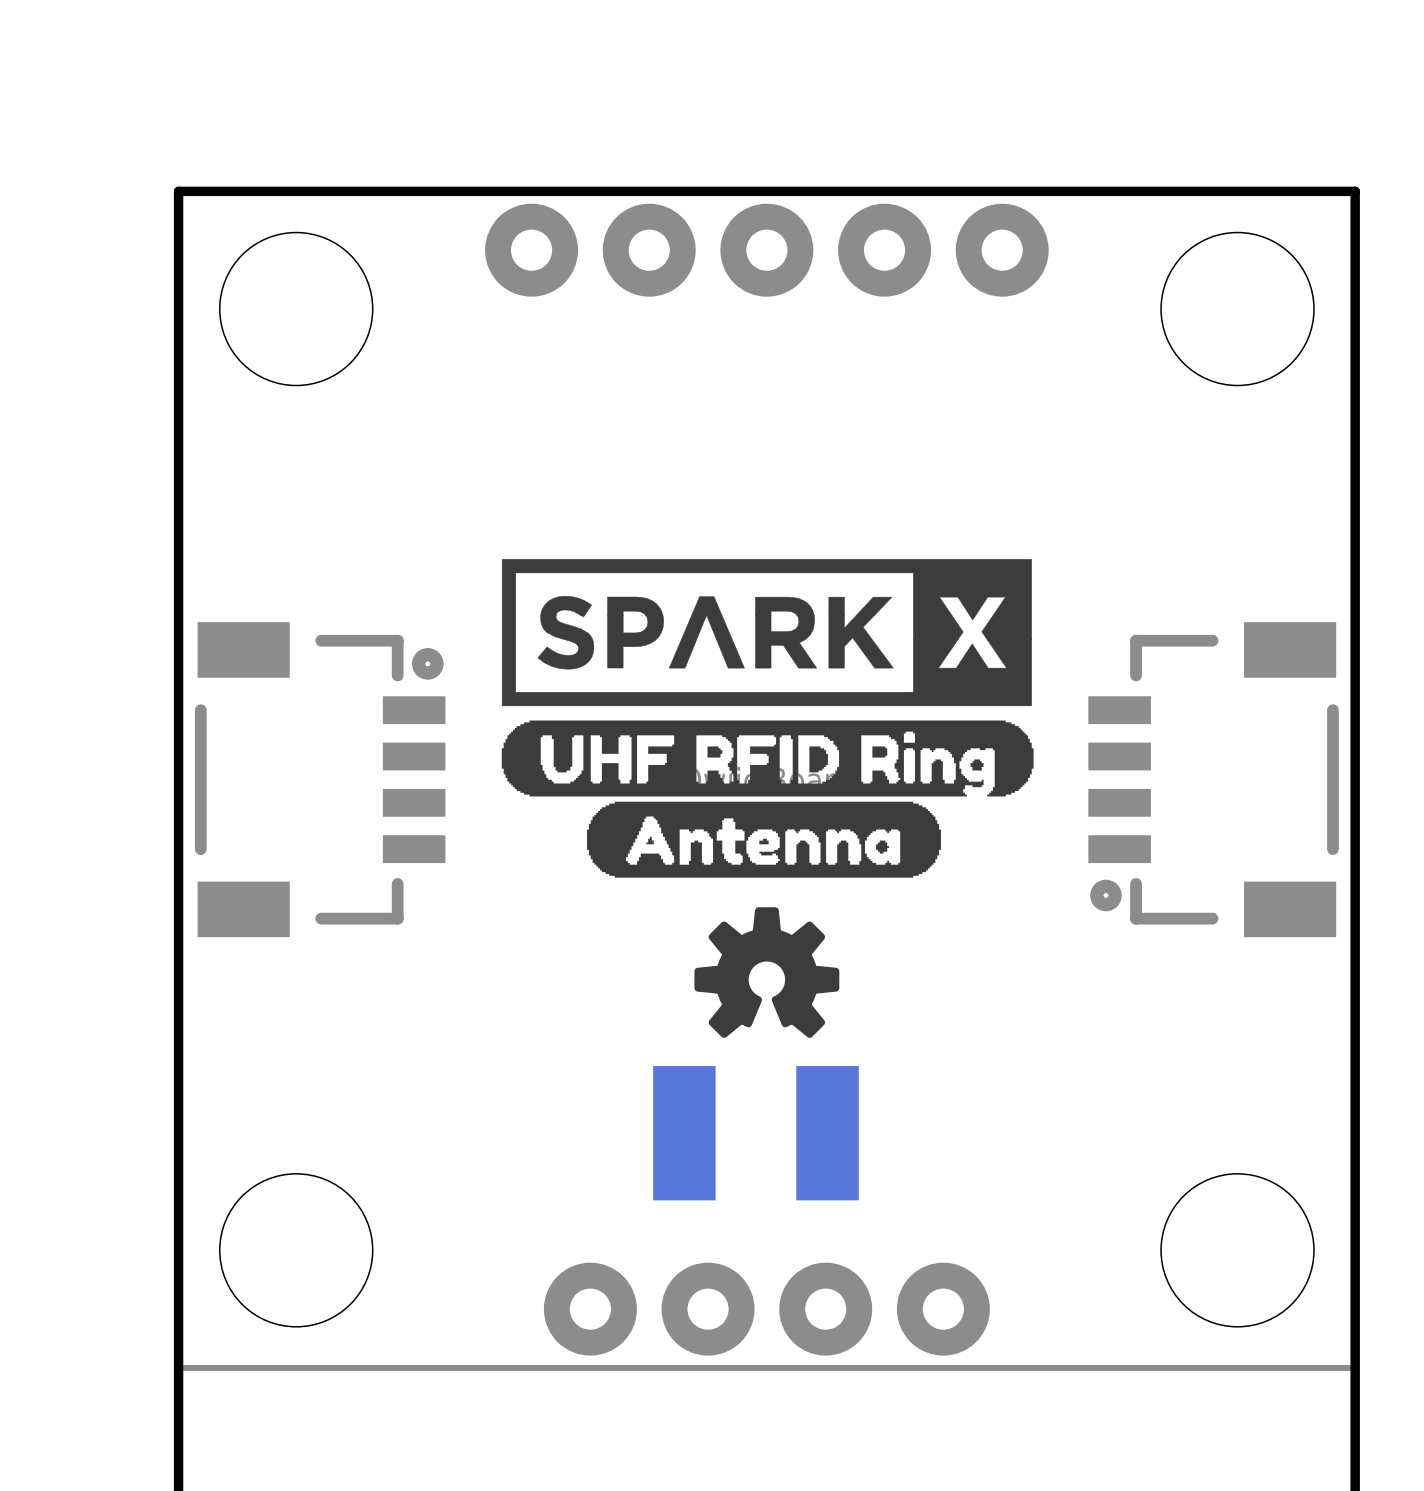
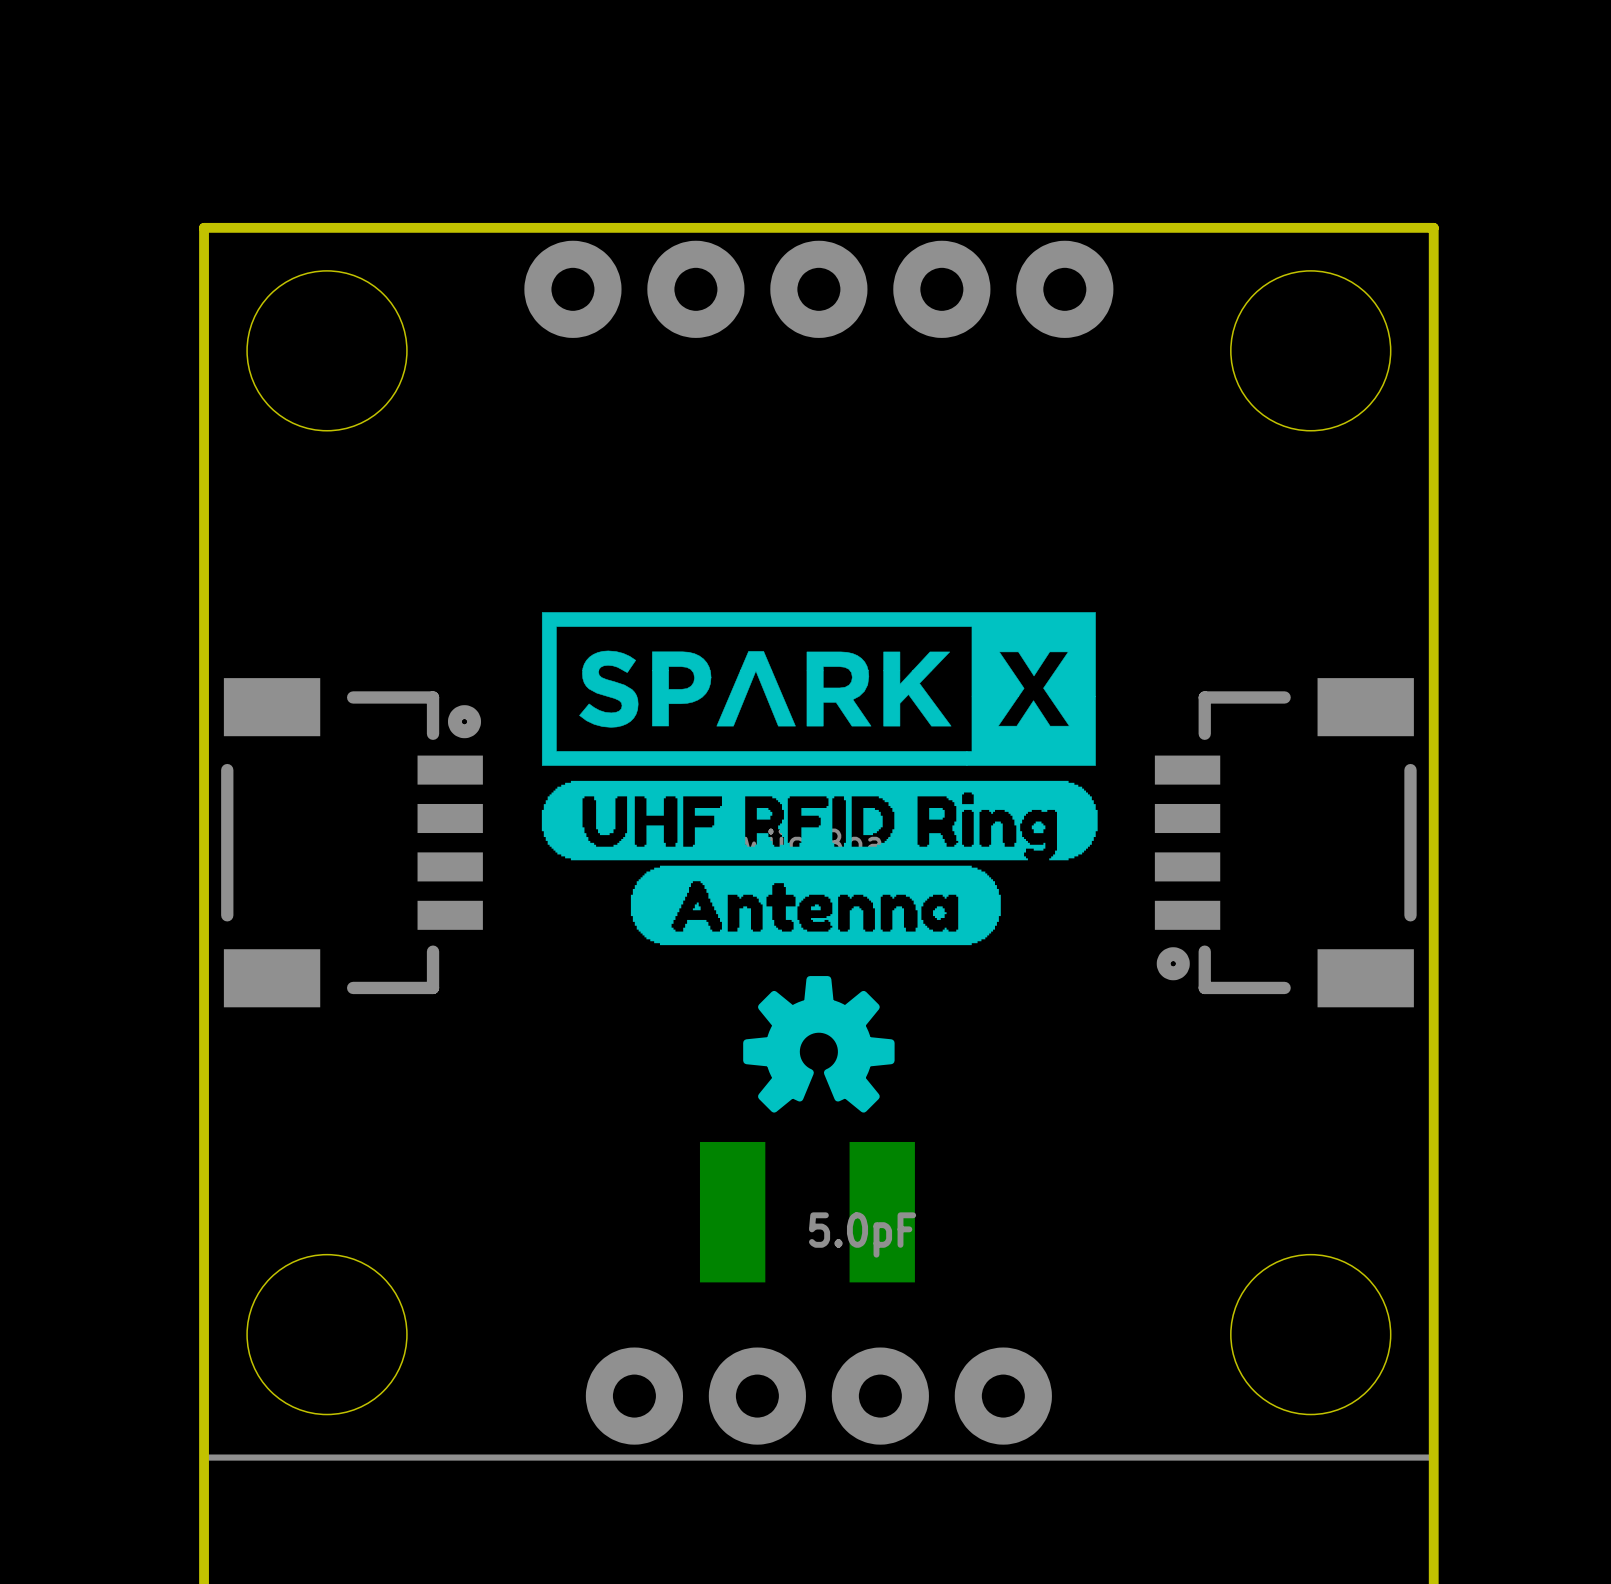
text: none -> 5.0pF (862, 1234)

